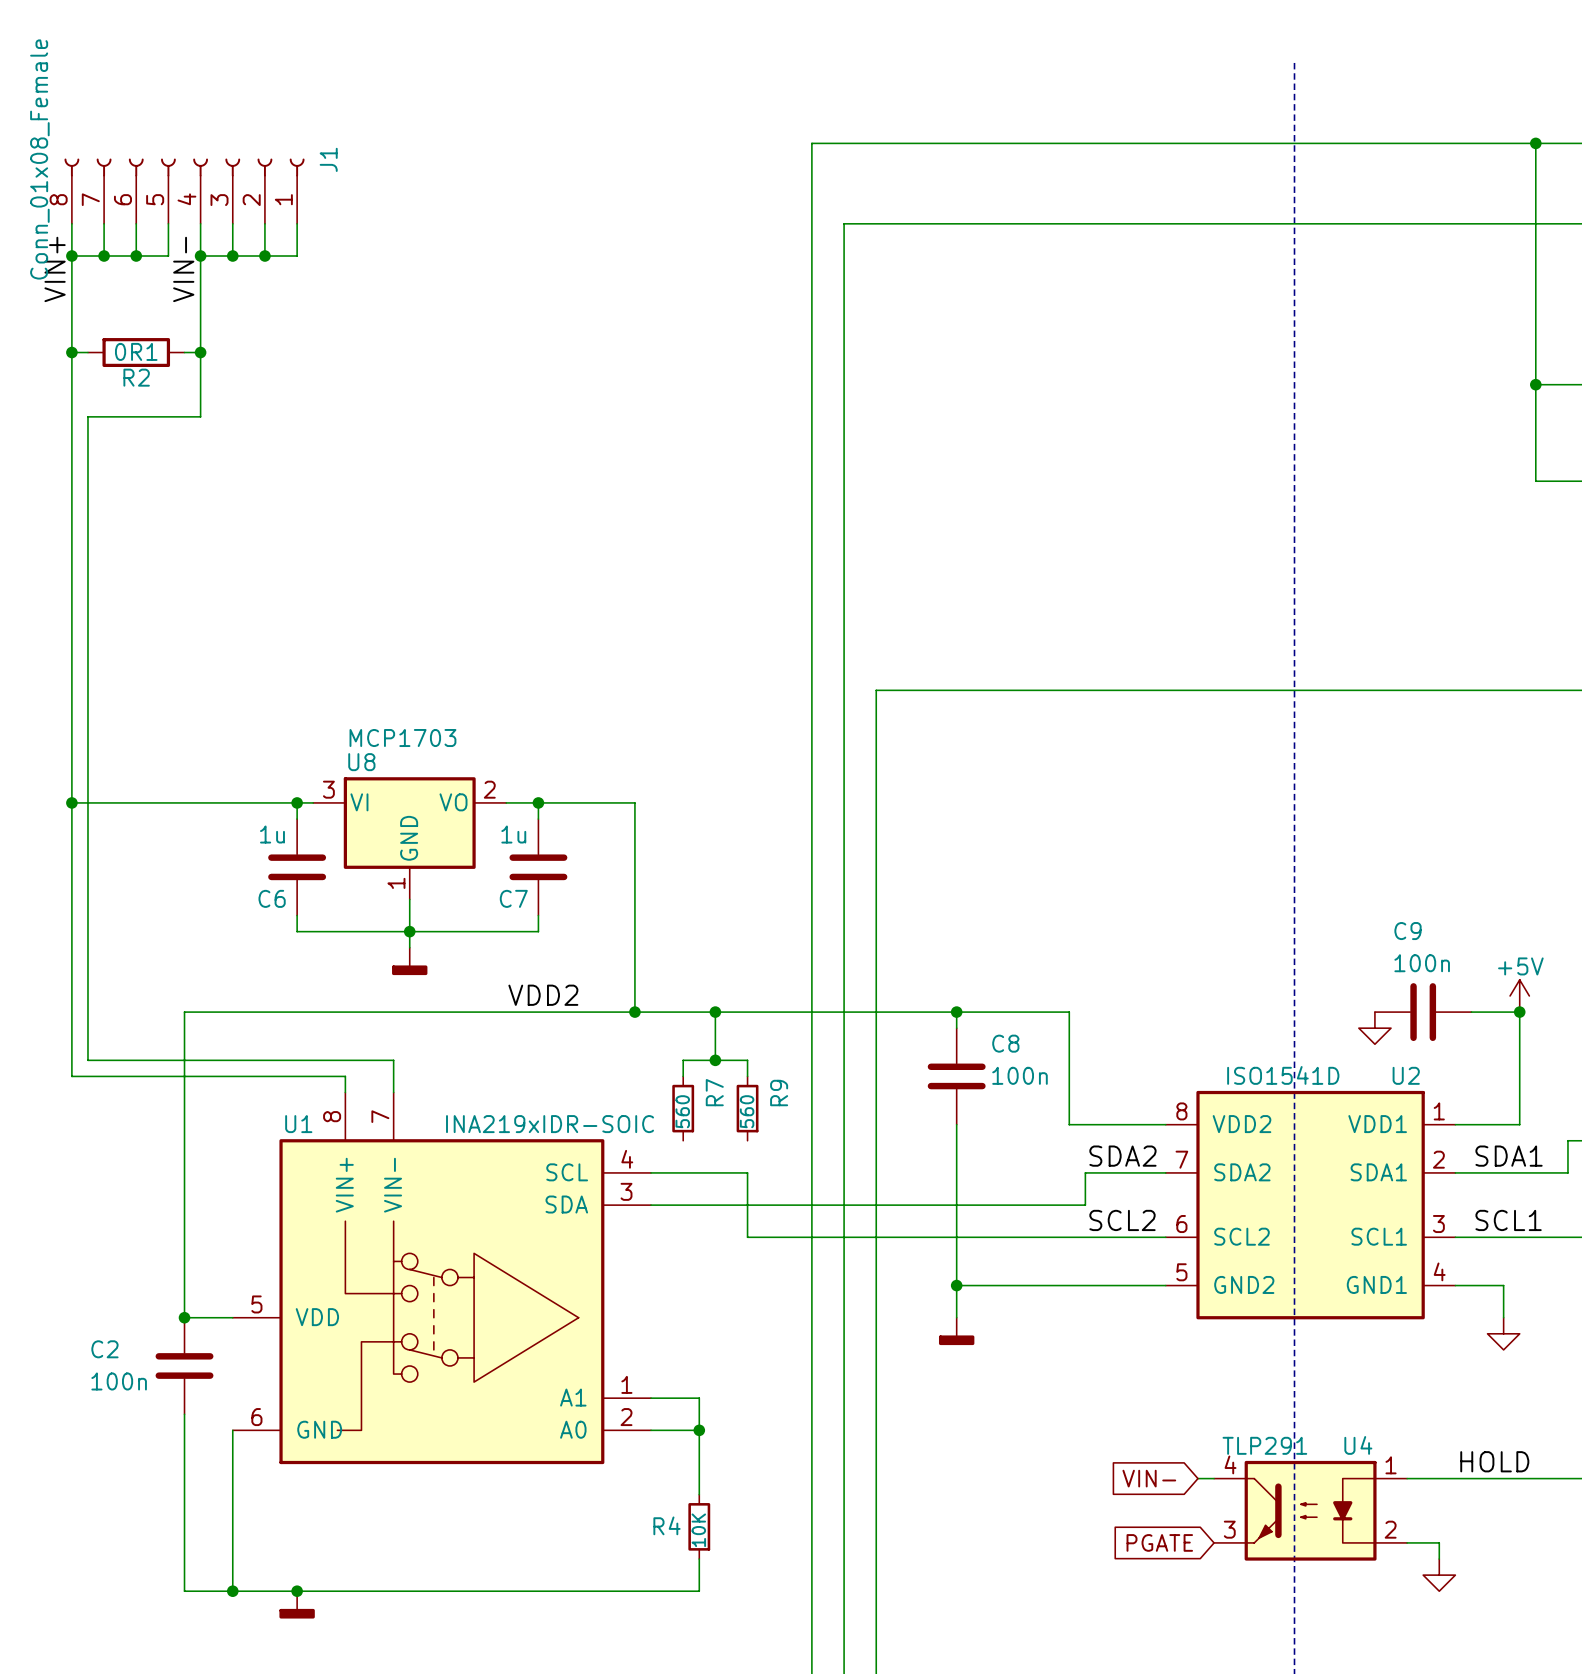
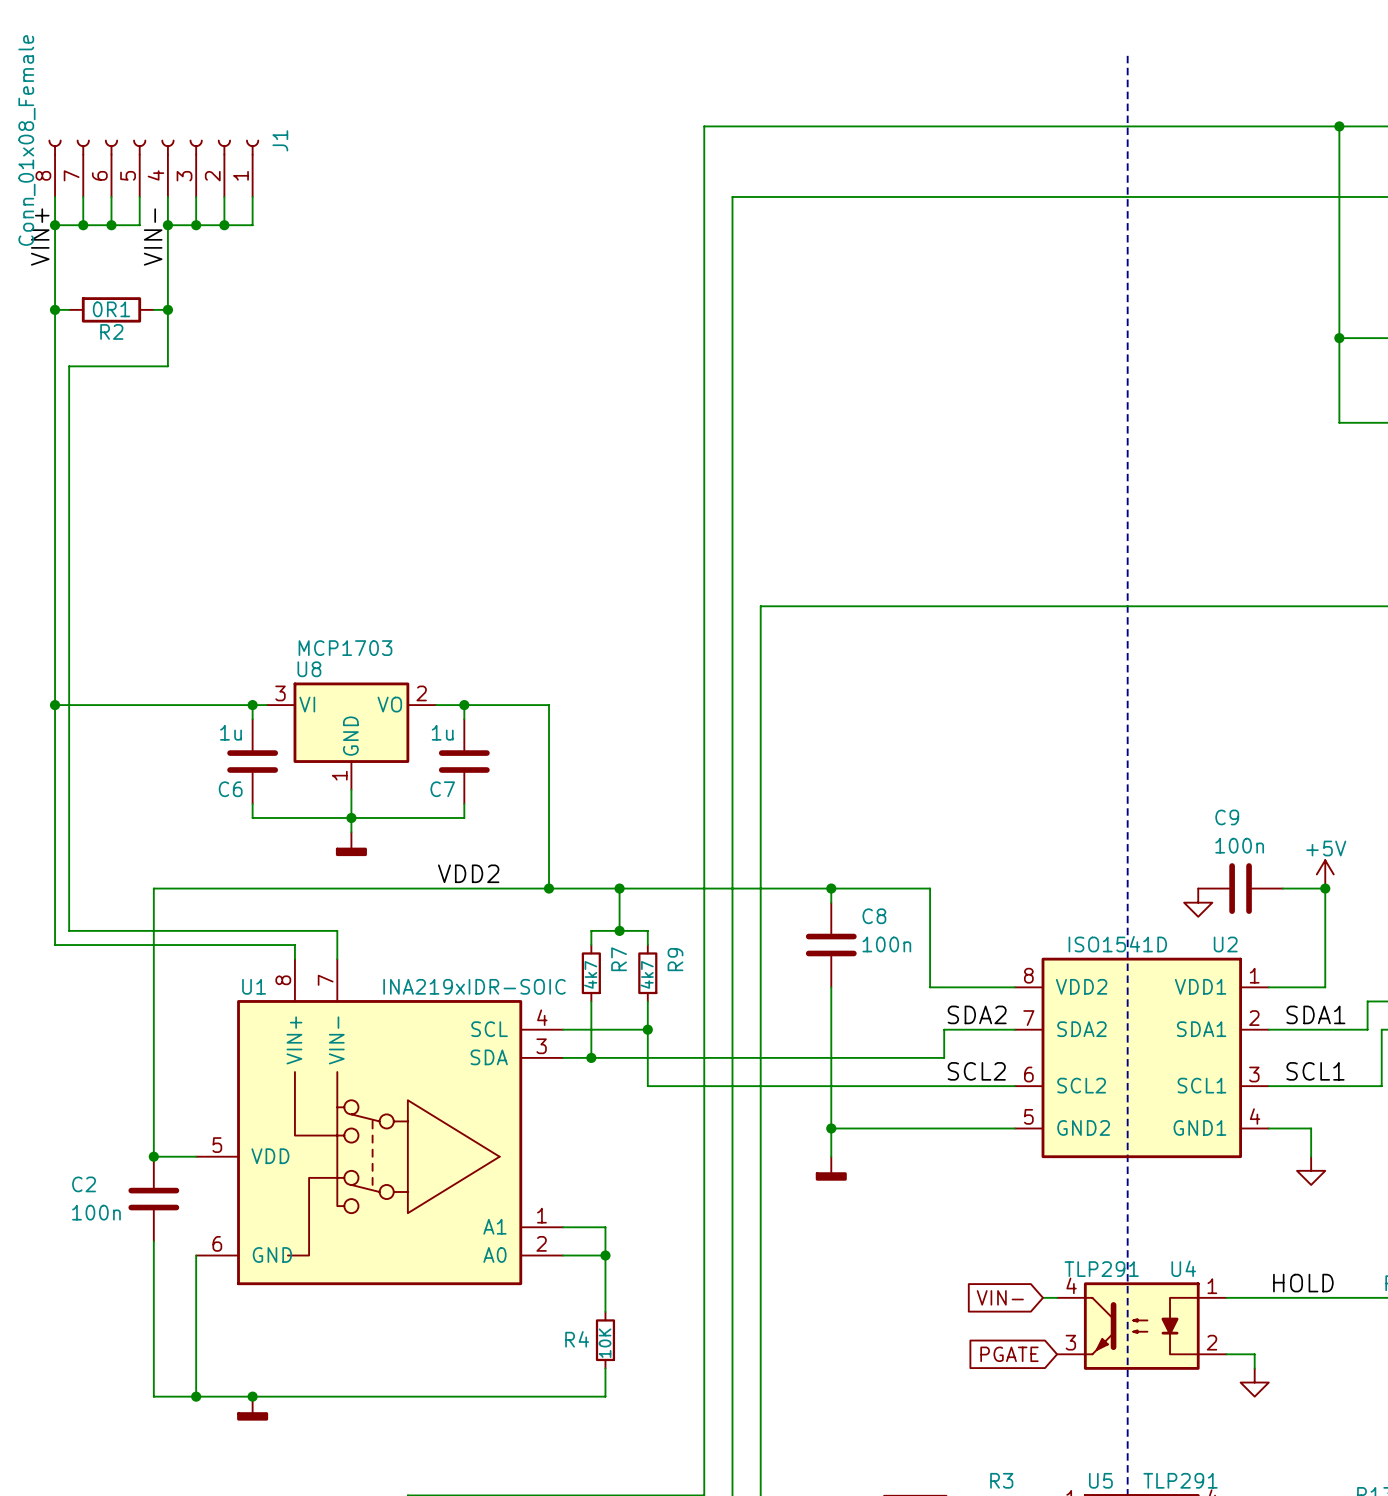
R7 value: 560 (682, 1111) -> 4k7 (590, 974)
R9 value: 560 (747, 1111) -> 4k7 (647, 974)
wire: none -> (591, 1001) (591, 1057)
wire: none -> (647, 1001) (647, 1029)
junction: none -> (647, 1029)
junction: none -> (591, 1057)

